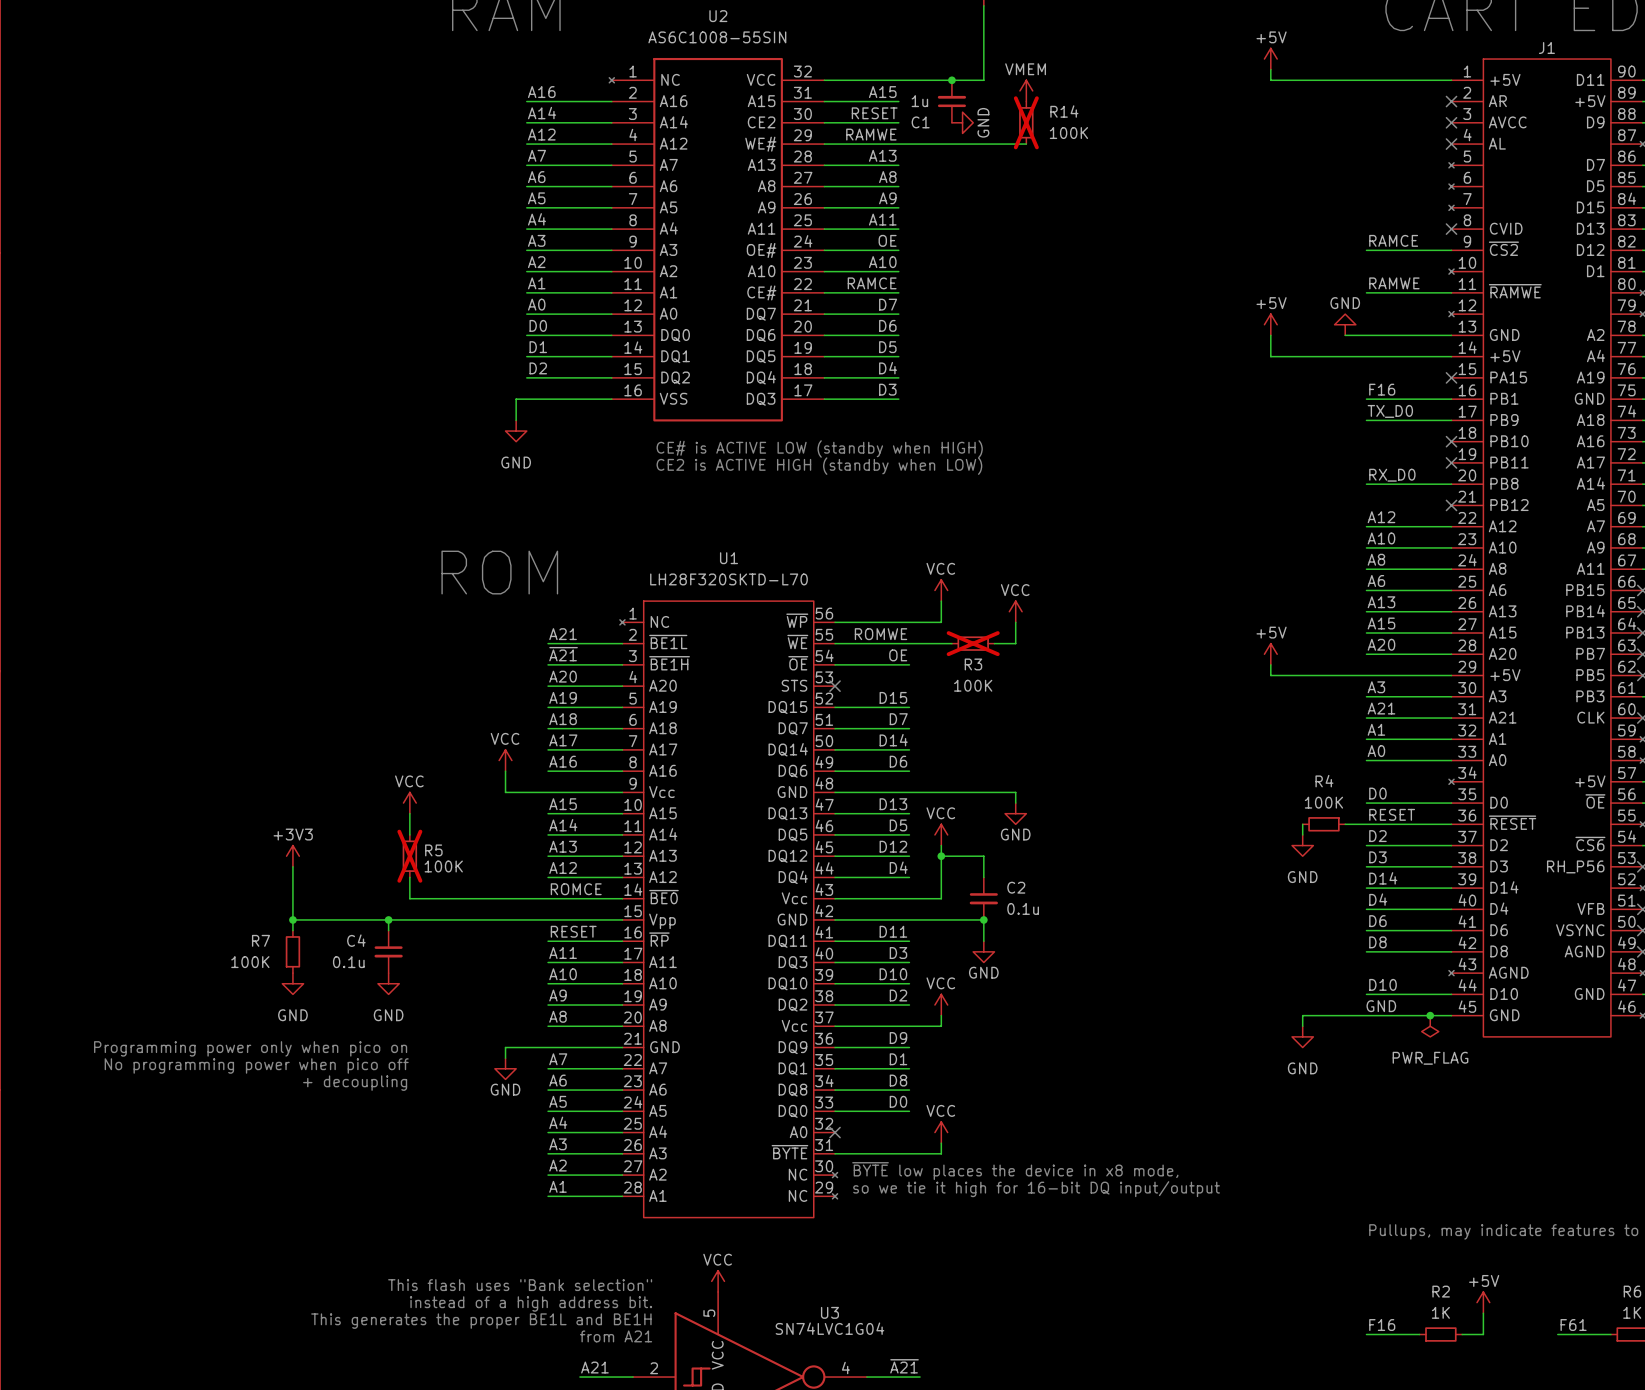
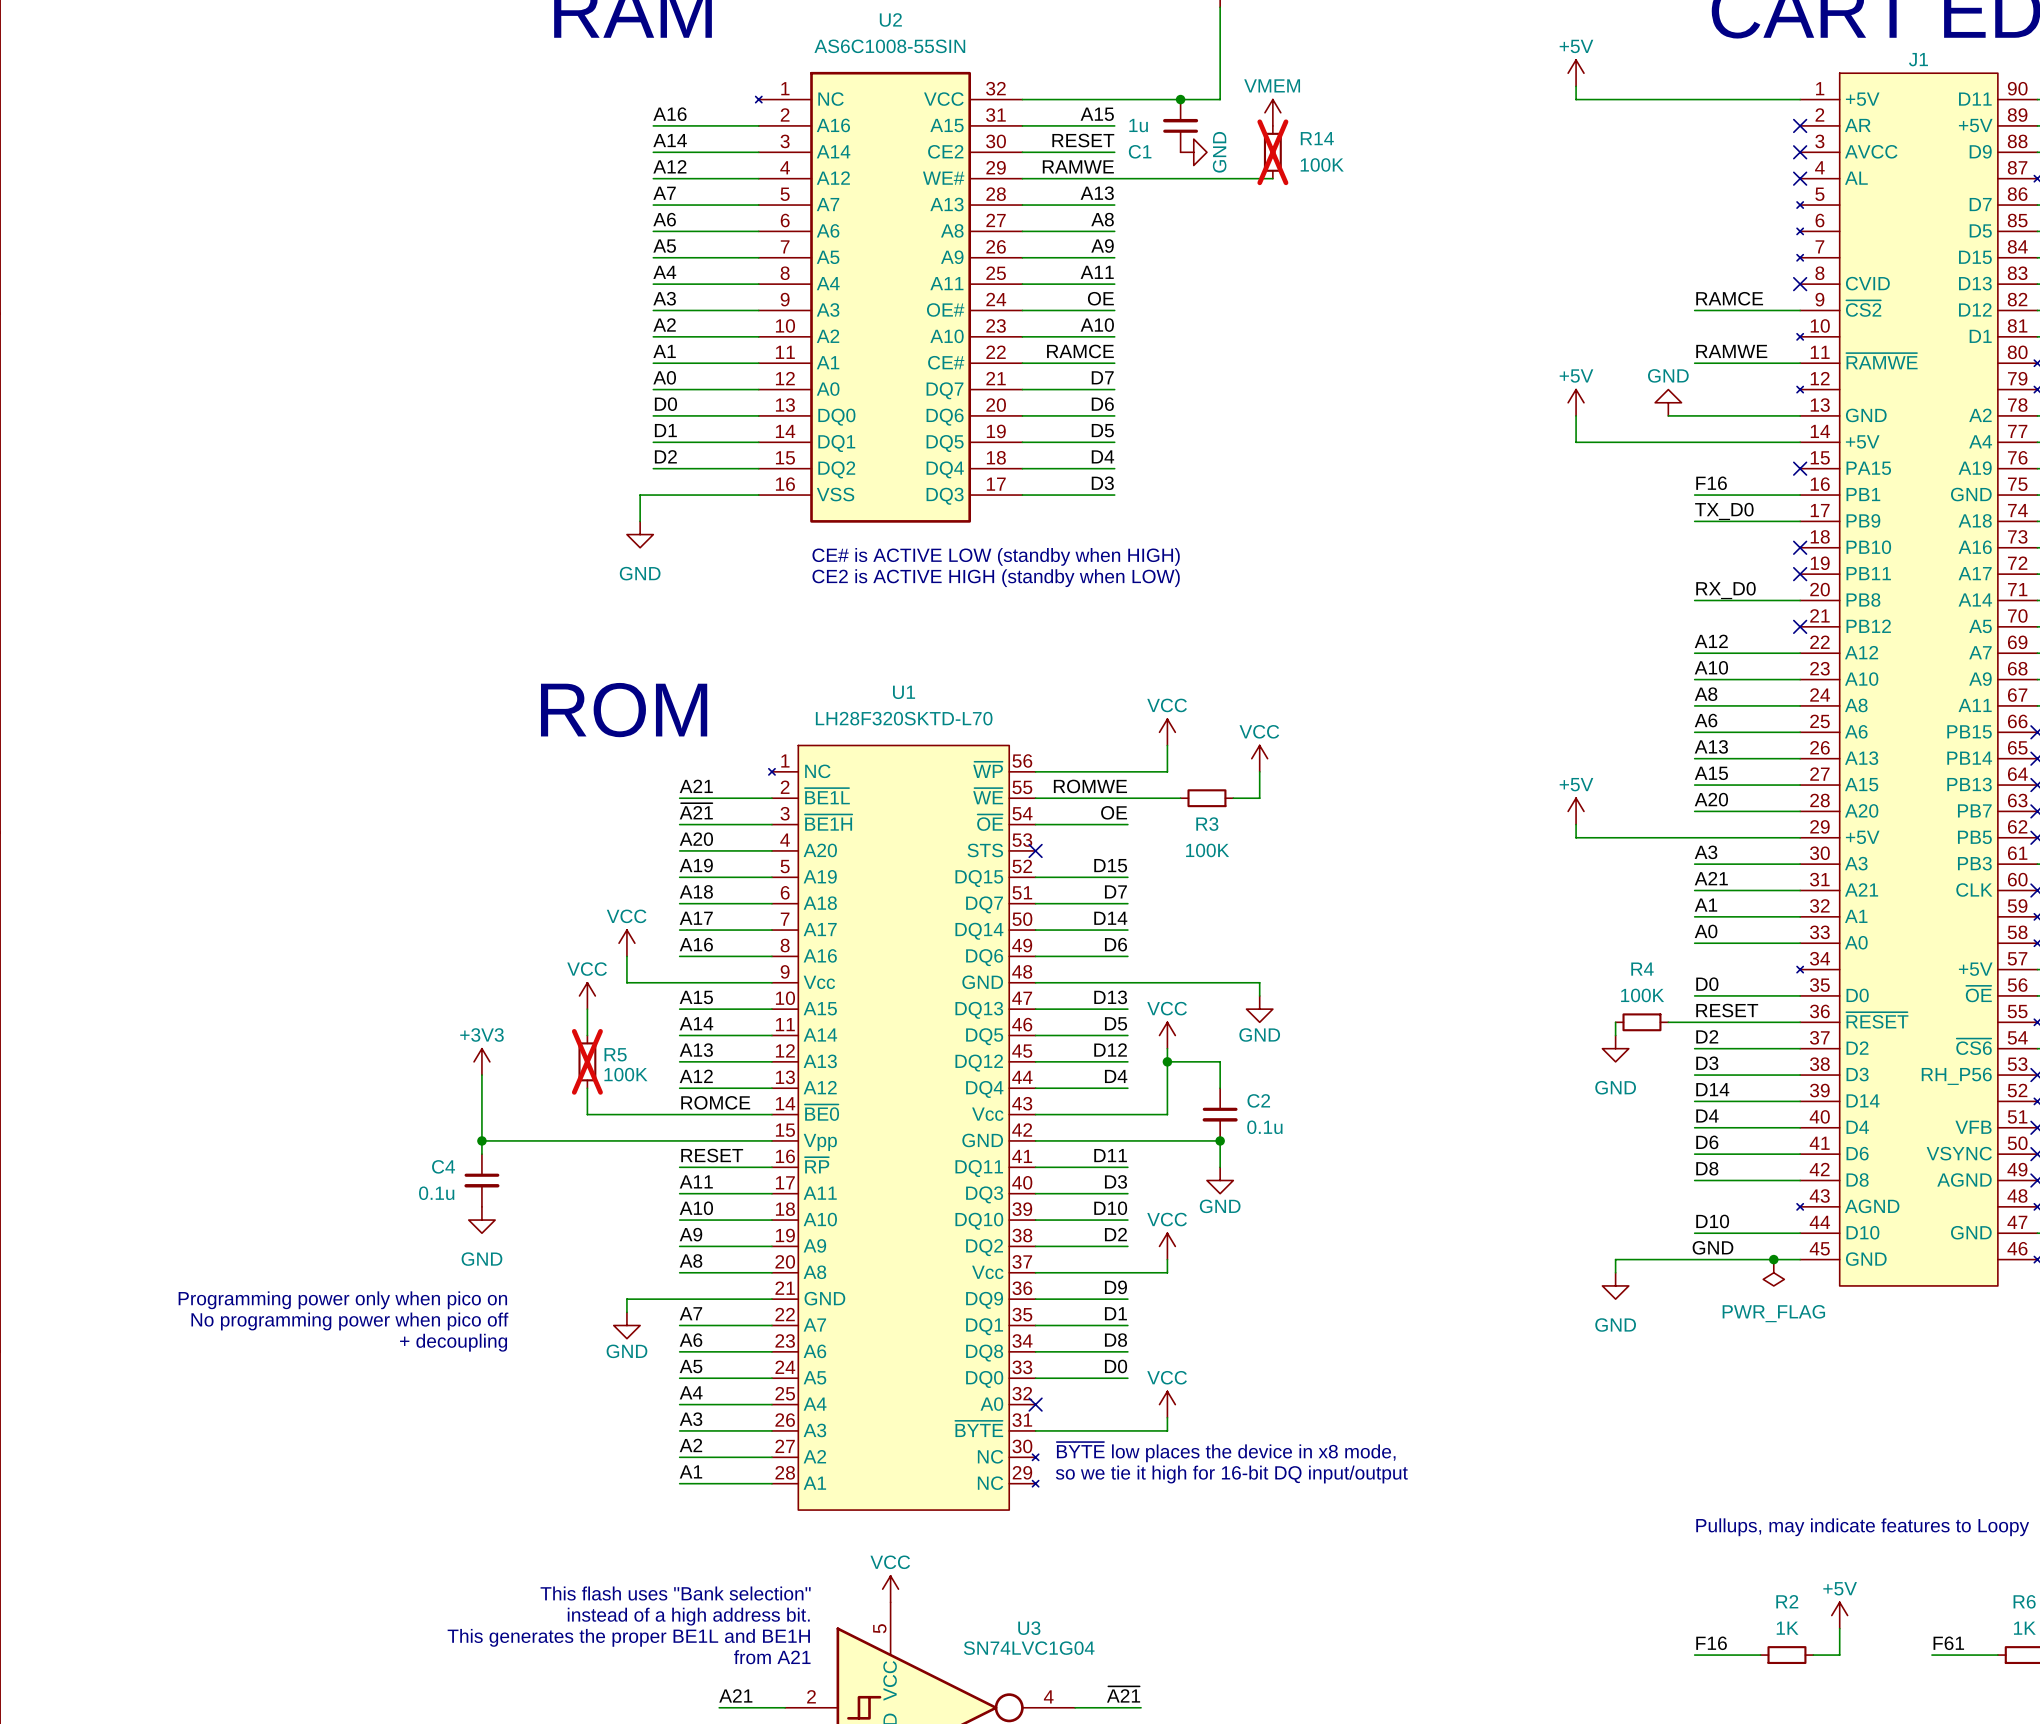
R3 do-not-place cross: (973, 643) -> none
power symbol position: VCC (409, 803) -> VCC (587, 995)
wire: (409, 813) (409, 834) -> (587, 1009) (587, 1035)
power symbol position: +3V3 (292, 856) -> +3V3 (481, 1061)
R5 position: (409, 856) -> (587, 1061)
wire: (292, 866) (292, 930) -> none
wire: (409, 877) (409, 898) (473, 898) -> (587, 1088) (587, 1114)
wire: (292, 919) (388, 919) -> (481, 1075) (481, 1140)
junction: (292, 919) -> none
R7: 100K (292, 951) -> none
power symbol: GND (292, 983) -> none

